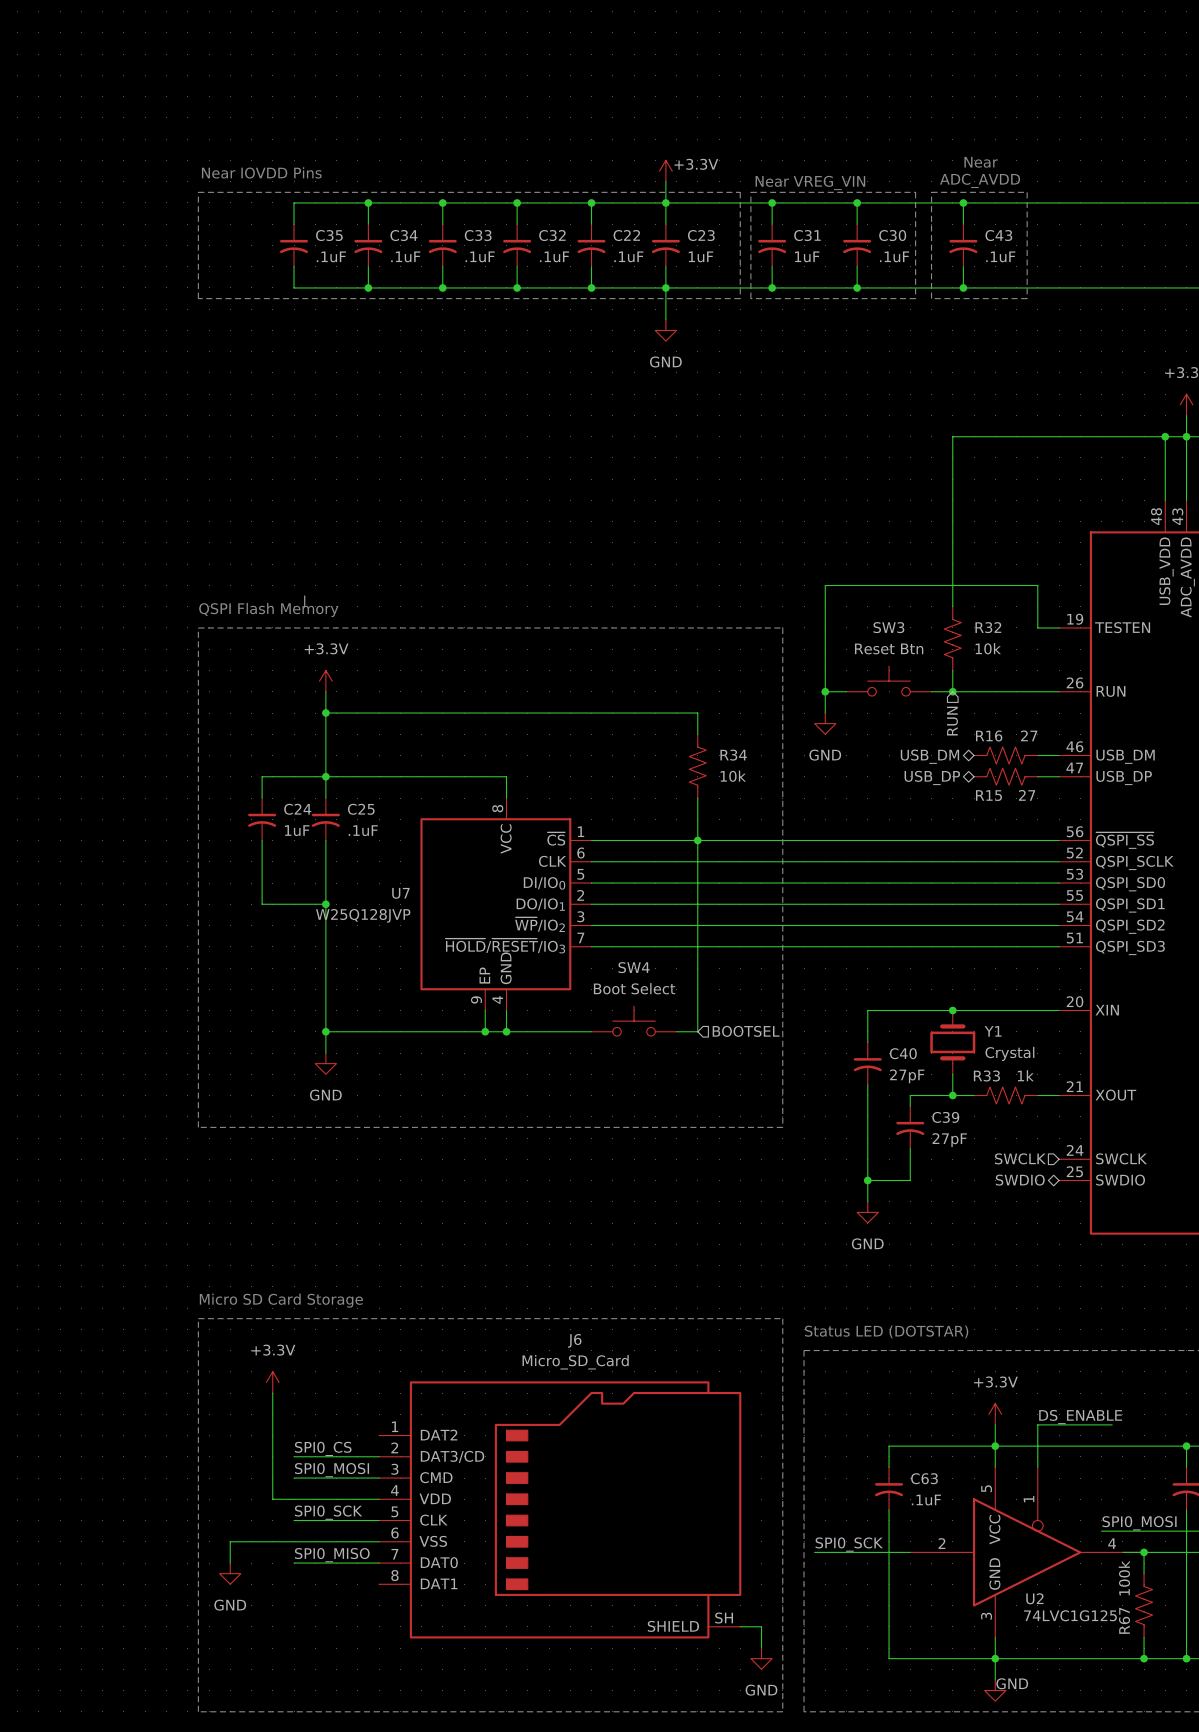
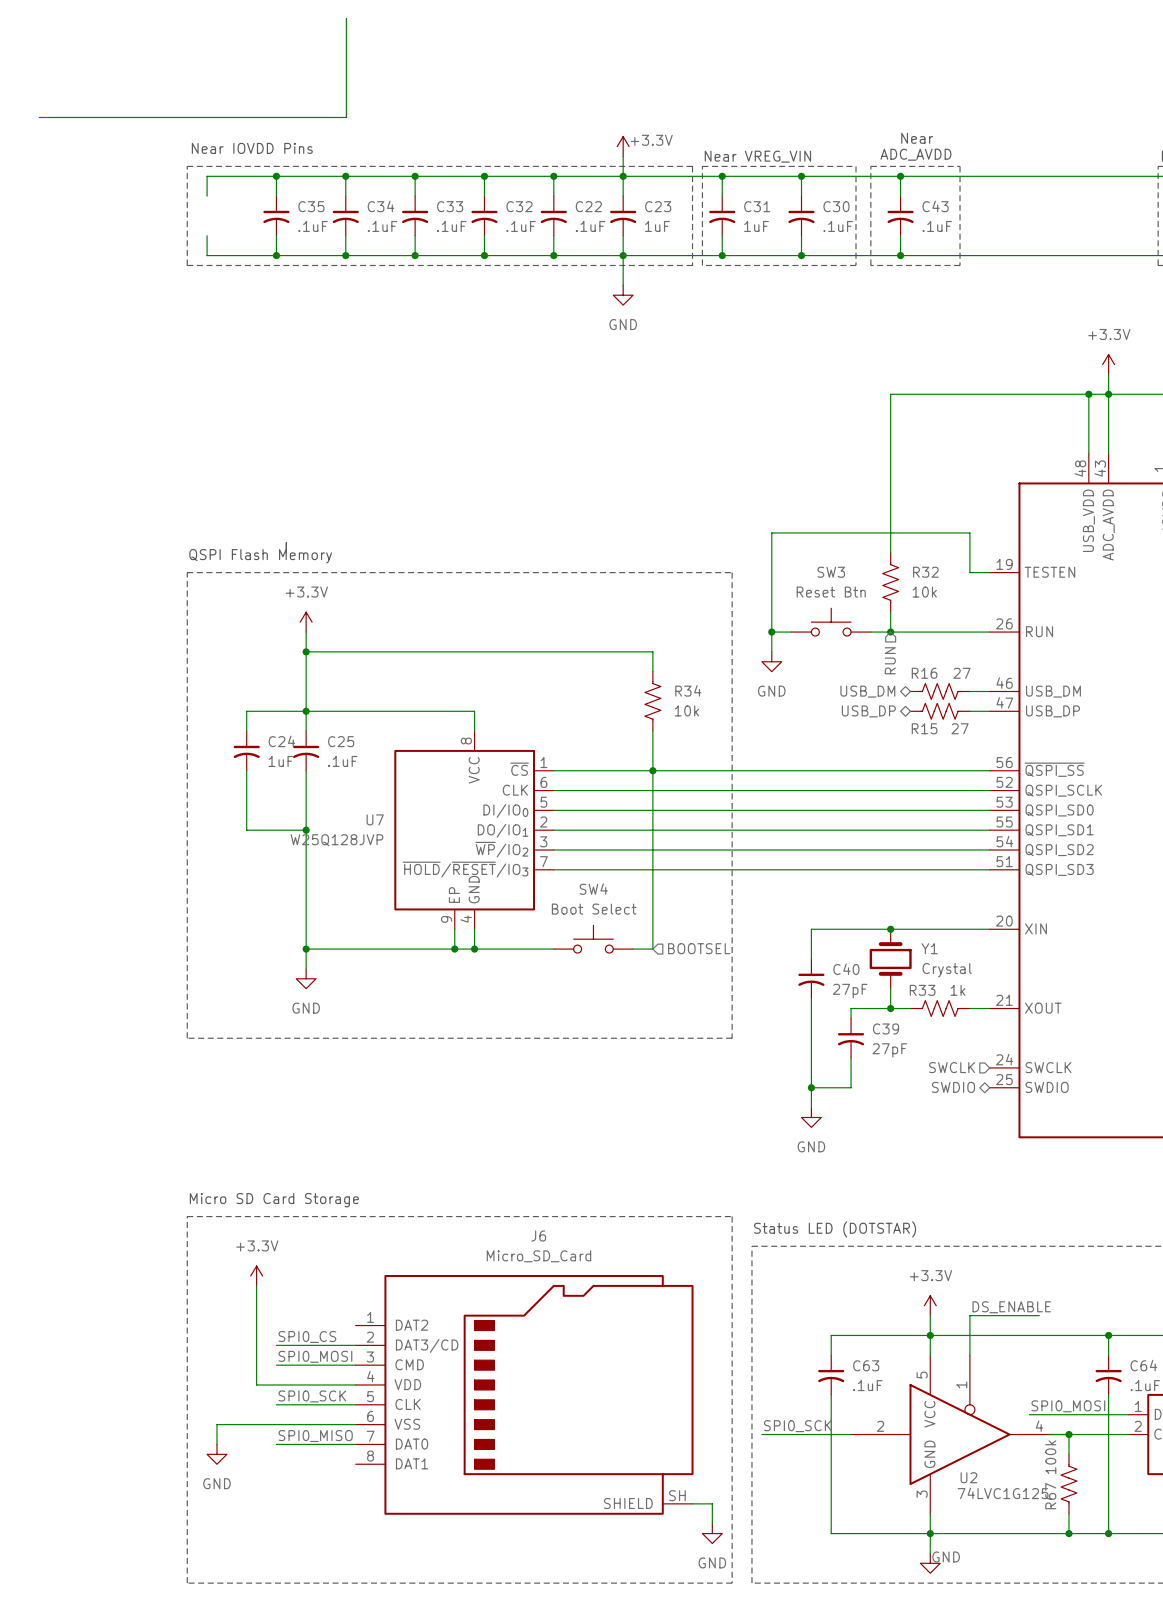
wire: none -> (346, 18) (346, 117) (39, 117)
wire: none -> (276, 176) (207, 176) (207, 196)
junction: none -> (276, 176)
wire: none -> (207, 235) (207, 255) (276, 255)
junction: none -> (276, 255)

